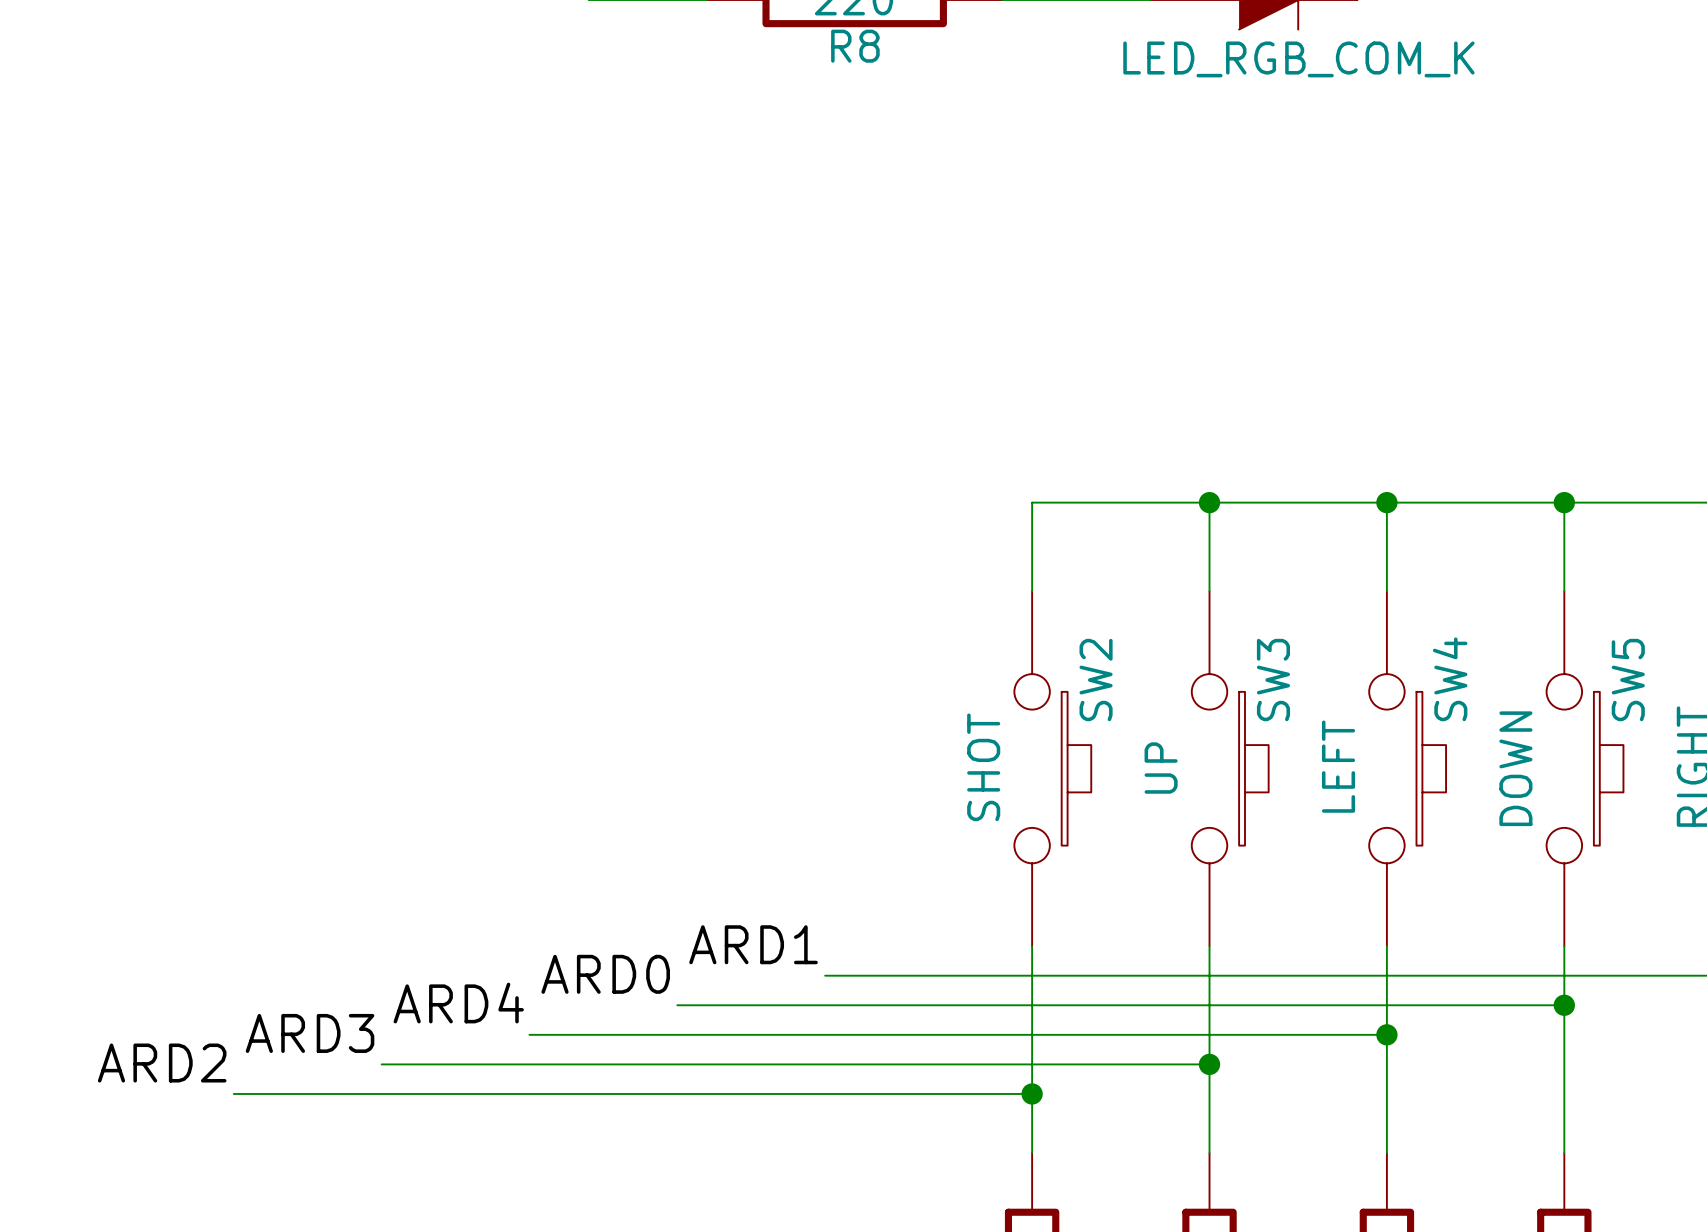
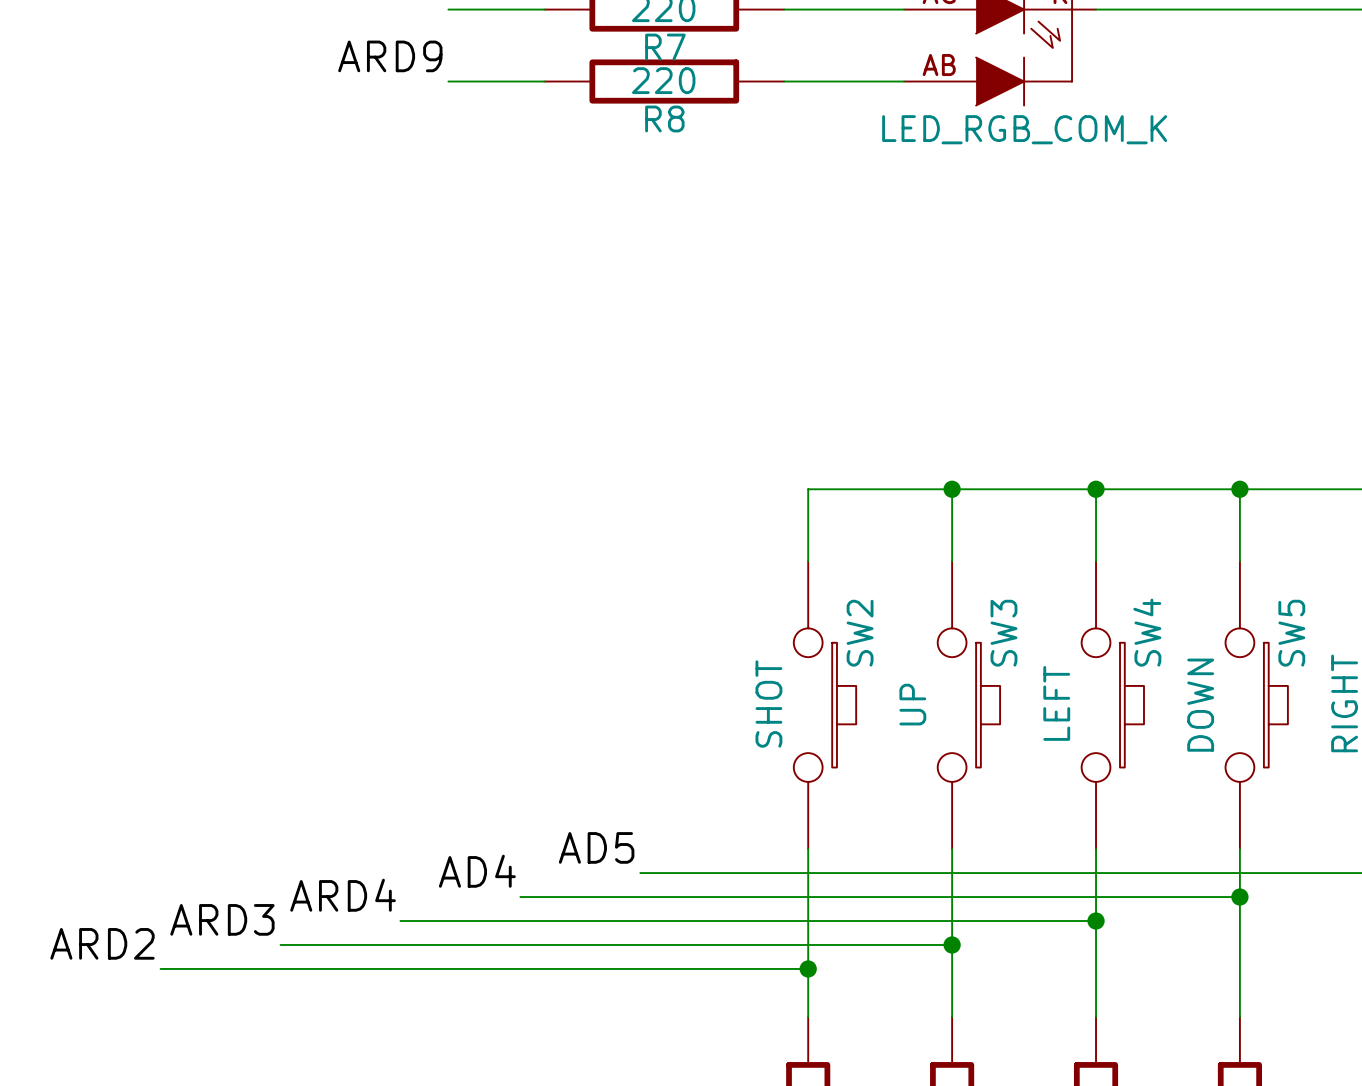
label: ARD1 (753, 944) -> AD5 (596, 847)
label: ARD0 (605, 974) -> AD4 (477, 871)

